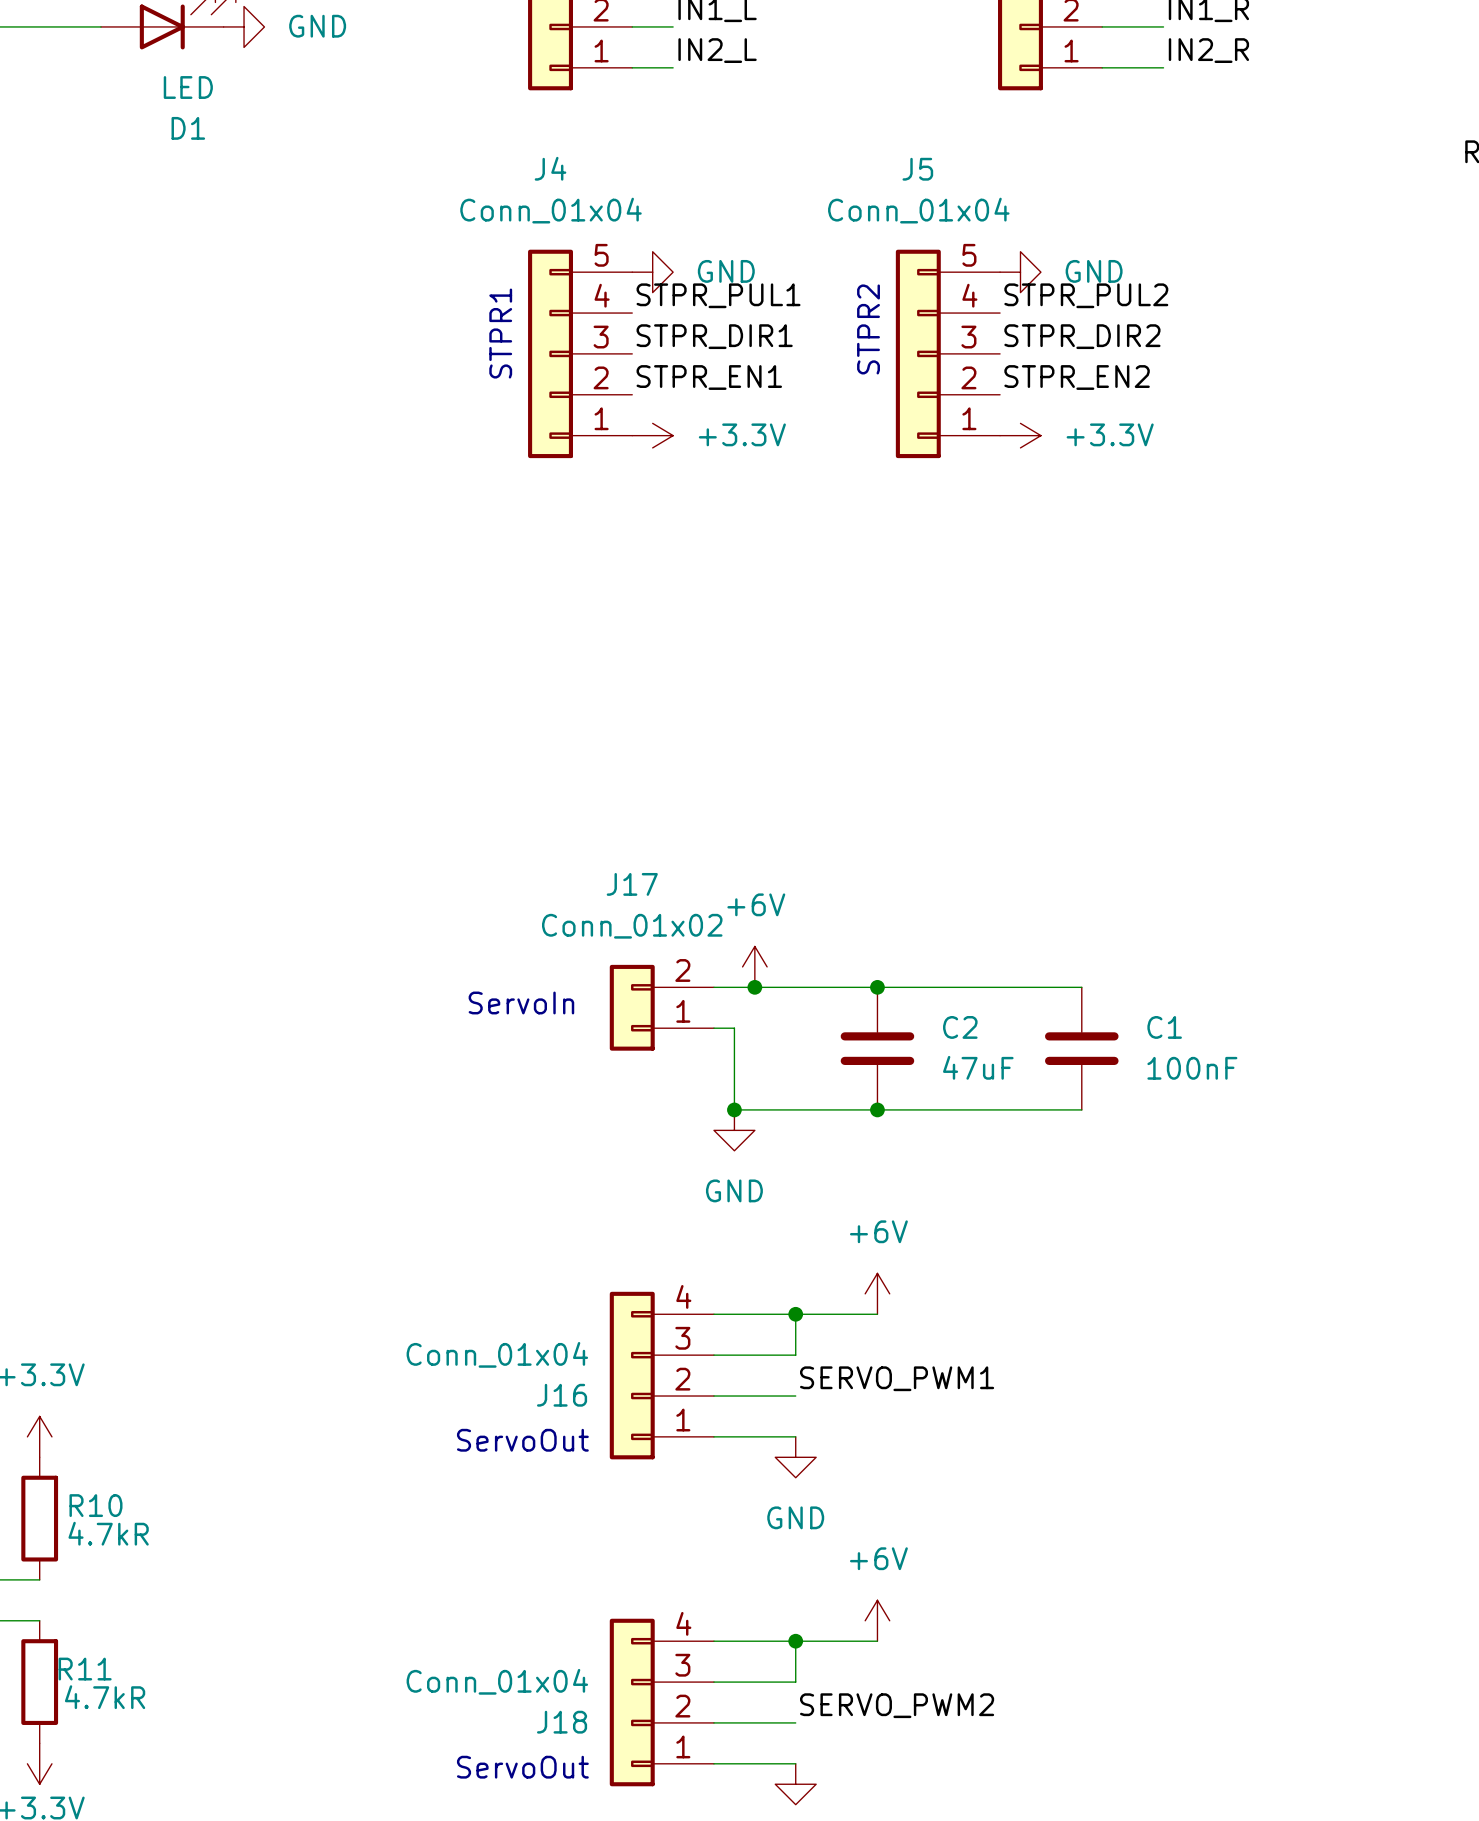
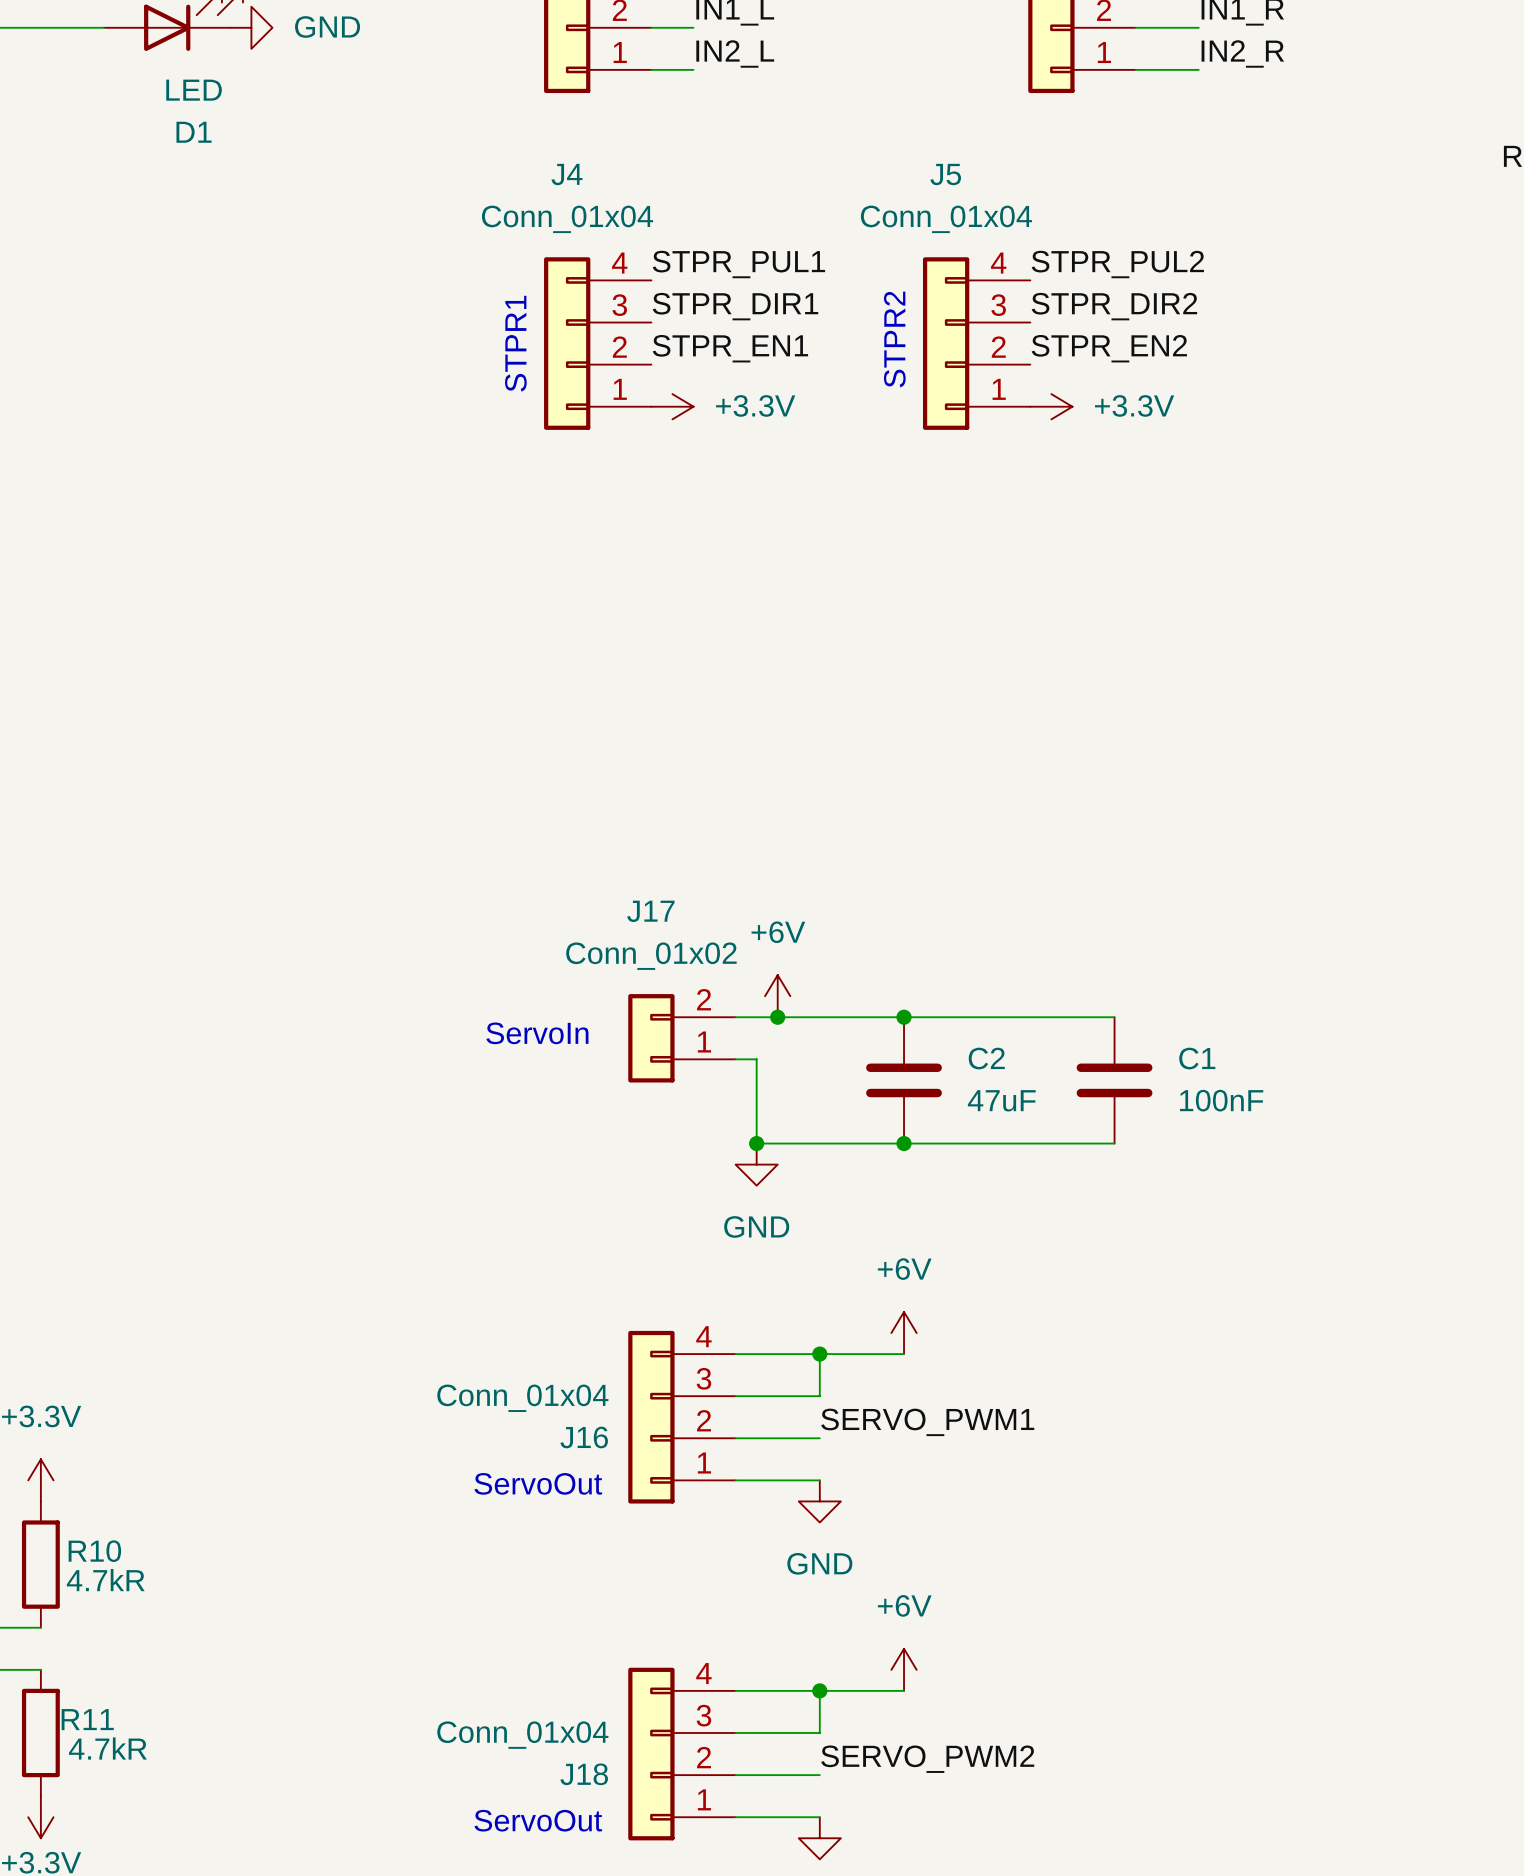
J4 symbol: [528, 249, 633, 459] -> [544, 257, 652, 430]
J5 symbol: [895, 249, 1001, 459] -> [922, 257, 1031, 430]
label: none -> STPR_PUL1 (738, 264)
label: none -> STPR_PUL2 (1117, 264)
power symbol: GND (652, 272) -> none
power symbol: GND (1020, 272) -> none
label: STPR_PUL1 (718, 295) -> STPR_DIR1 (735, 306)
label: STPR_PUL2 (1086, 295) -> STPR_DIR2 (1114, 306)
label: STPR_DIR1 (714, 336) -> STPR_EN1 (730, 348)
label: STPR_DIR2 (1082, 336) -> STPR_EN2 (1109, 348)
label: STPR_EN1 (709, 377) -> none
label: STPR_EN2 (1077, 377) -> none
power symbol position: +3.3V (652, 435) -> +3.3V (672, 406)
power symbol position: +3.3V (1020, 435) -> +3.3V (1051, 406)

